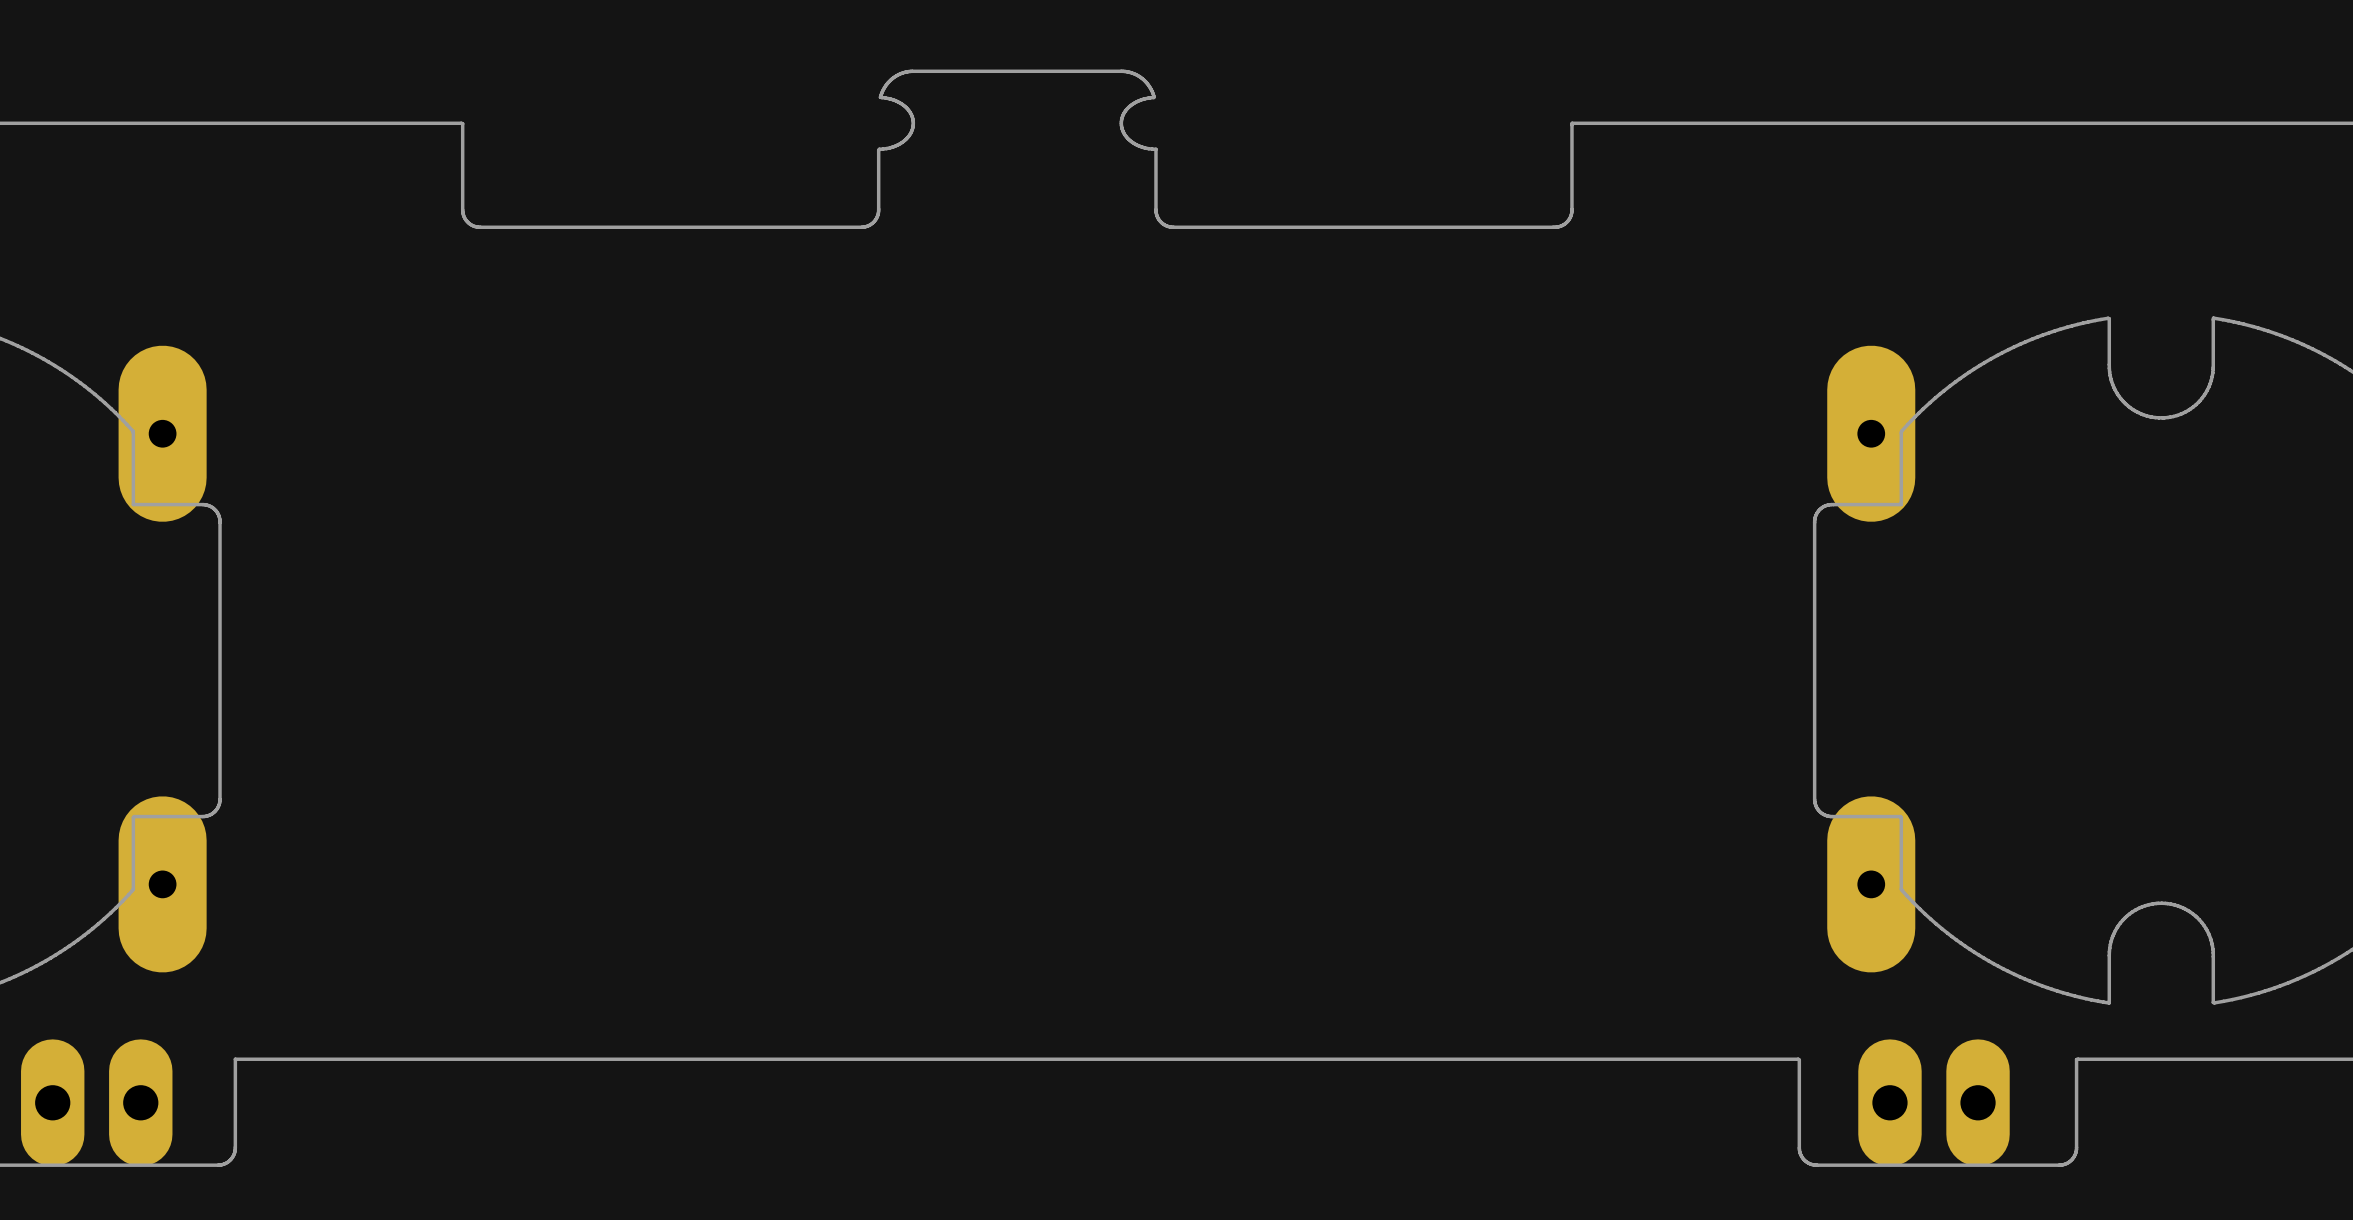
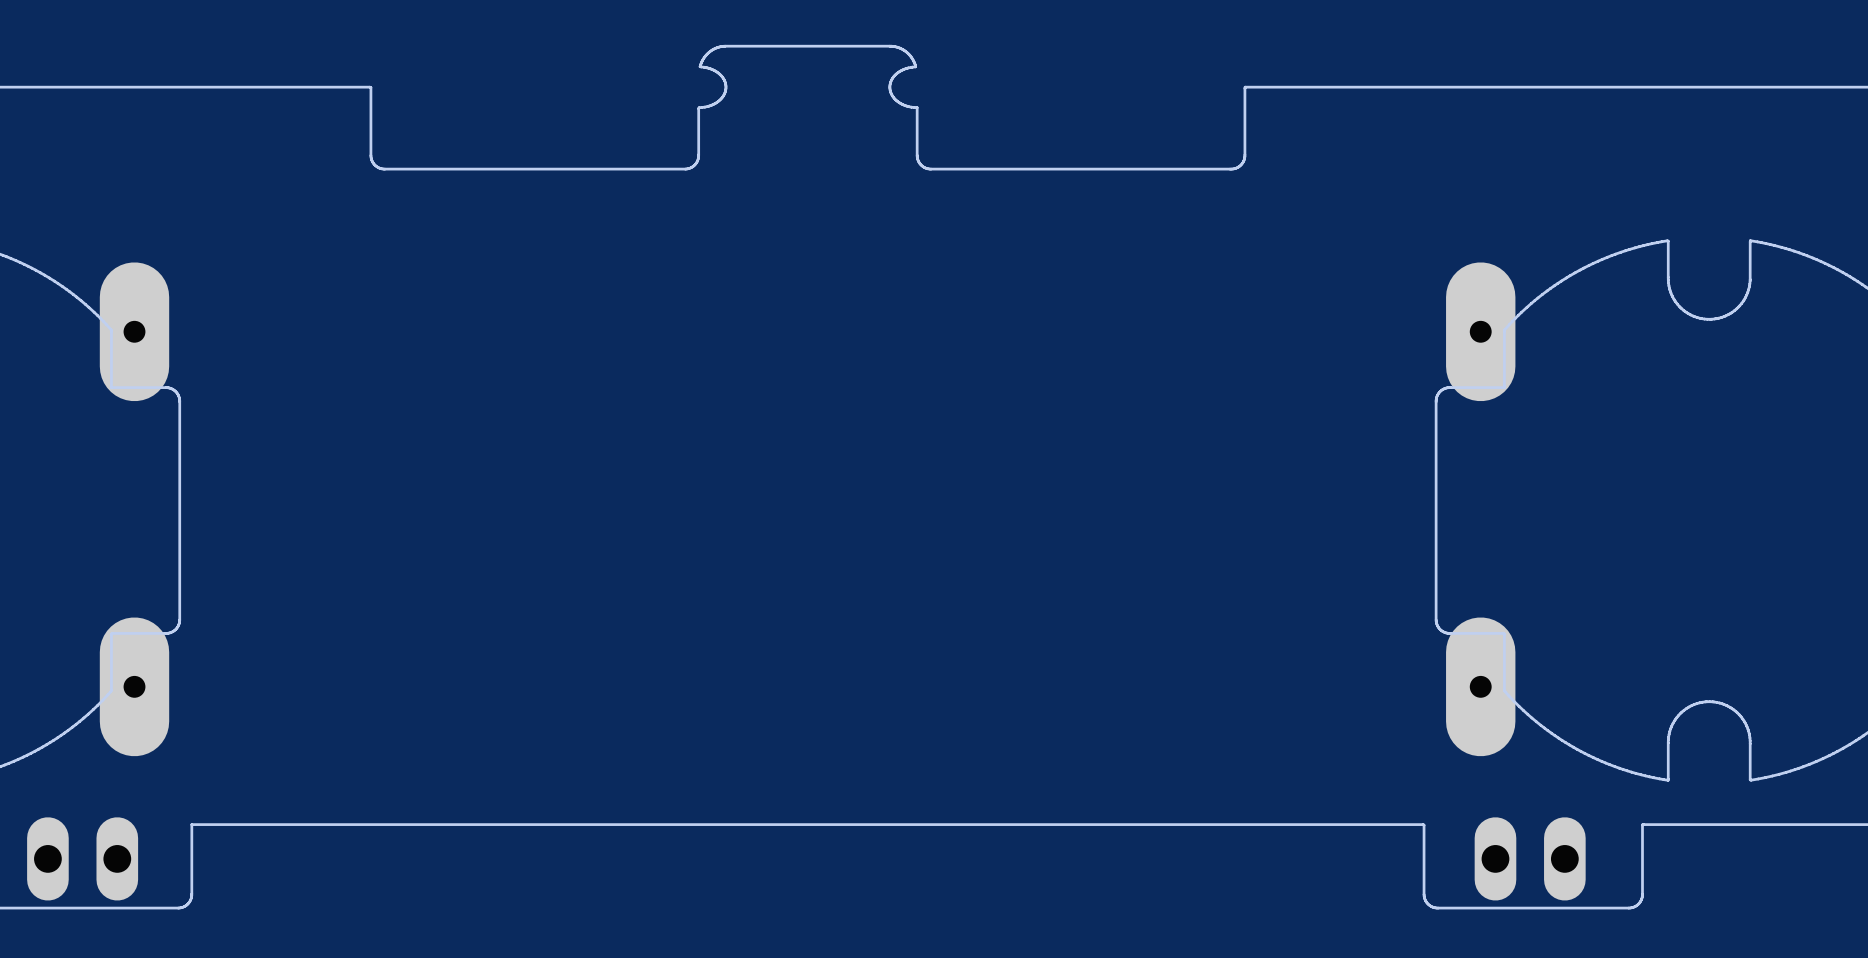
part footprint: [21, 1039, 173, 1167] -> [27, 817, 139, 901]
part footprint: [1858, 1039, 2010, 1167] -> [1474, 817, 1586, 901]

